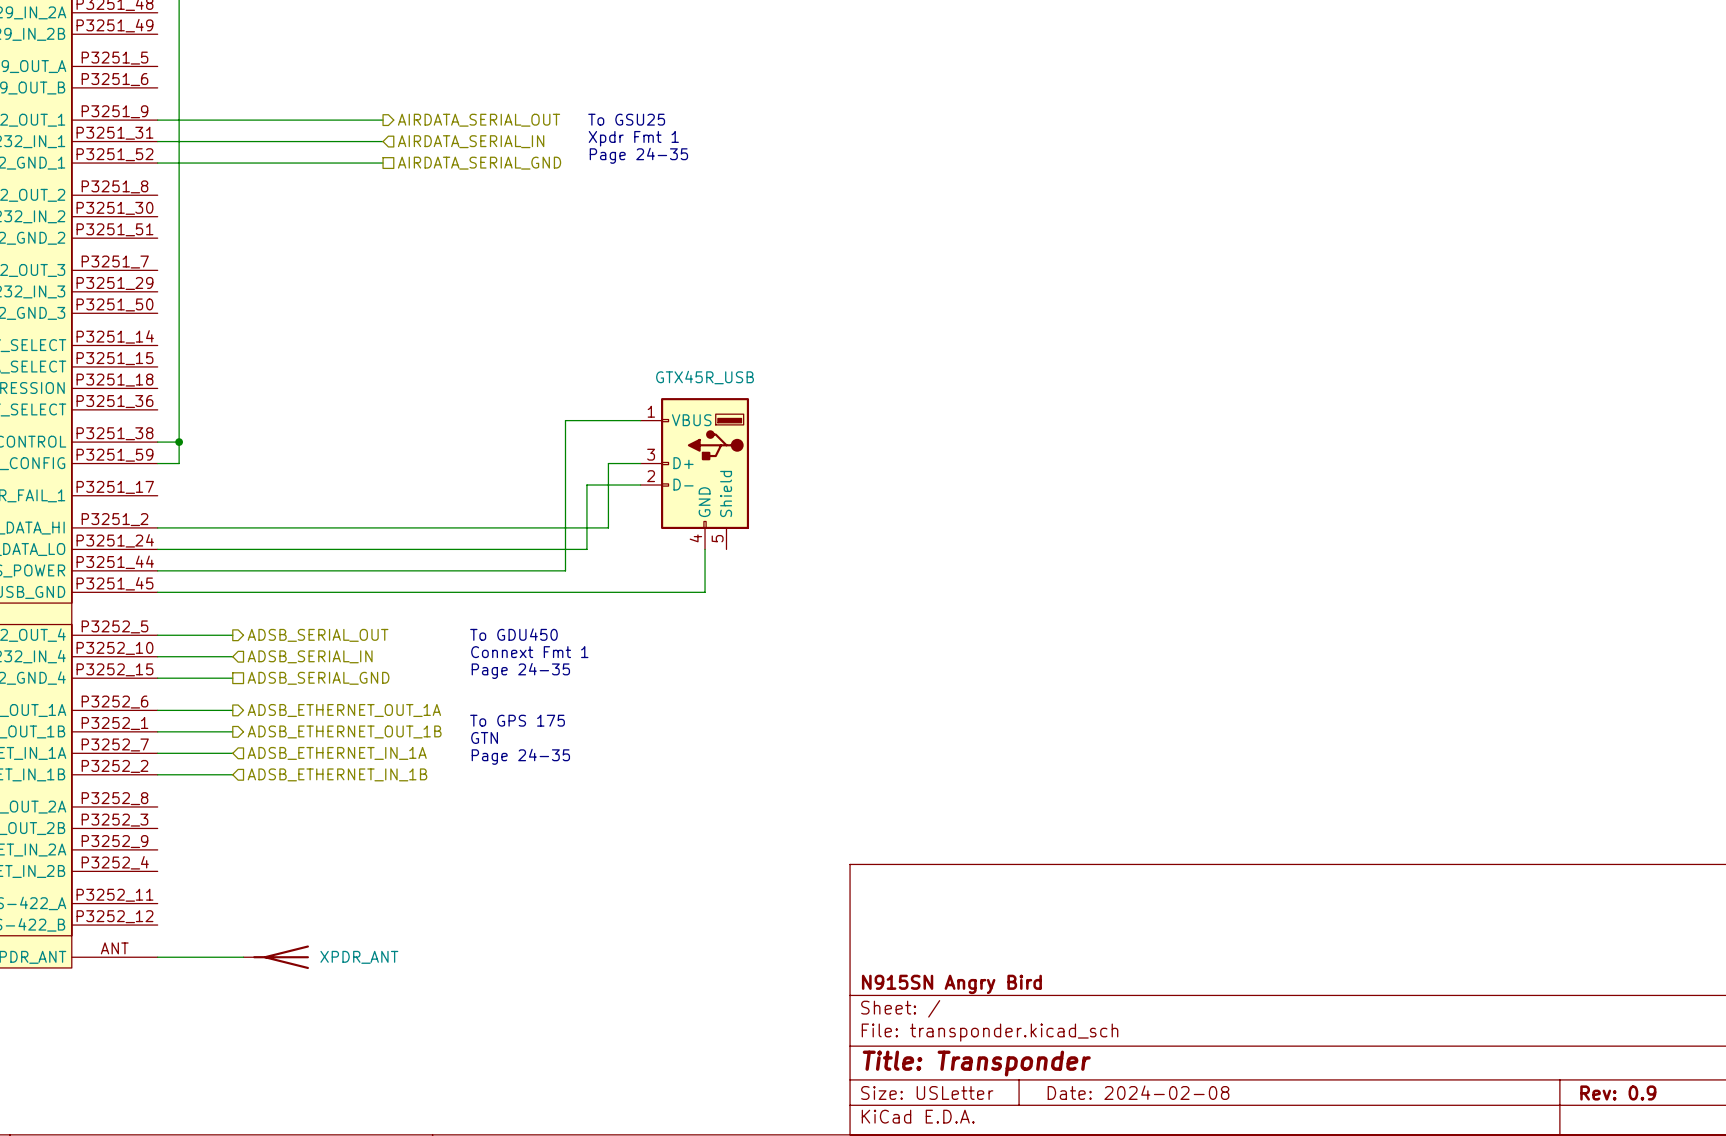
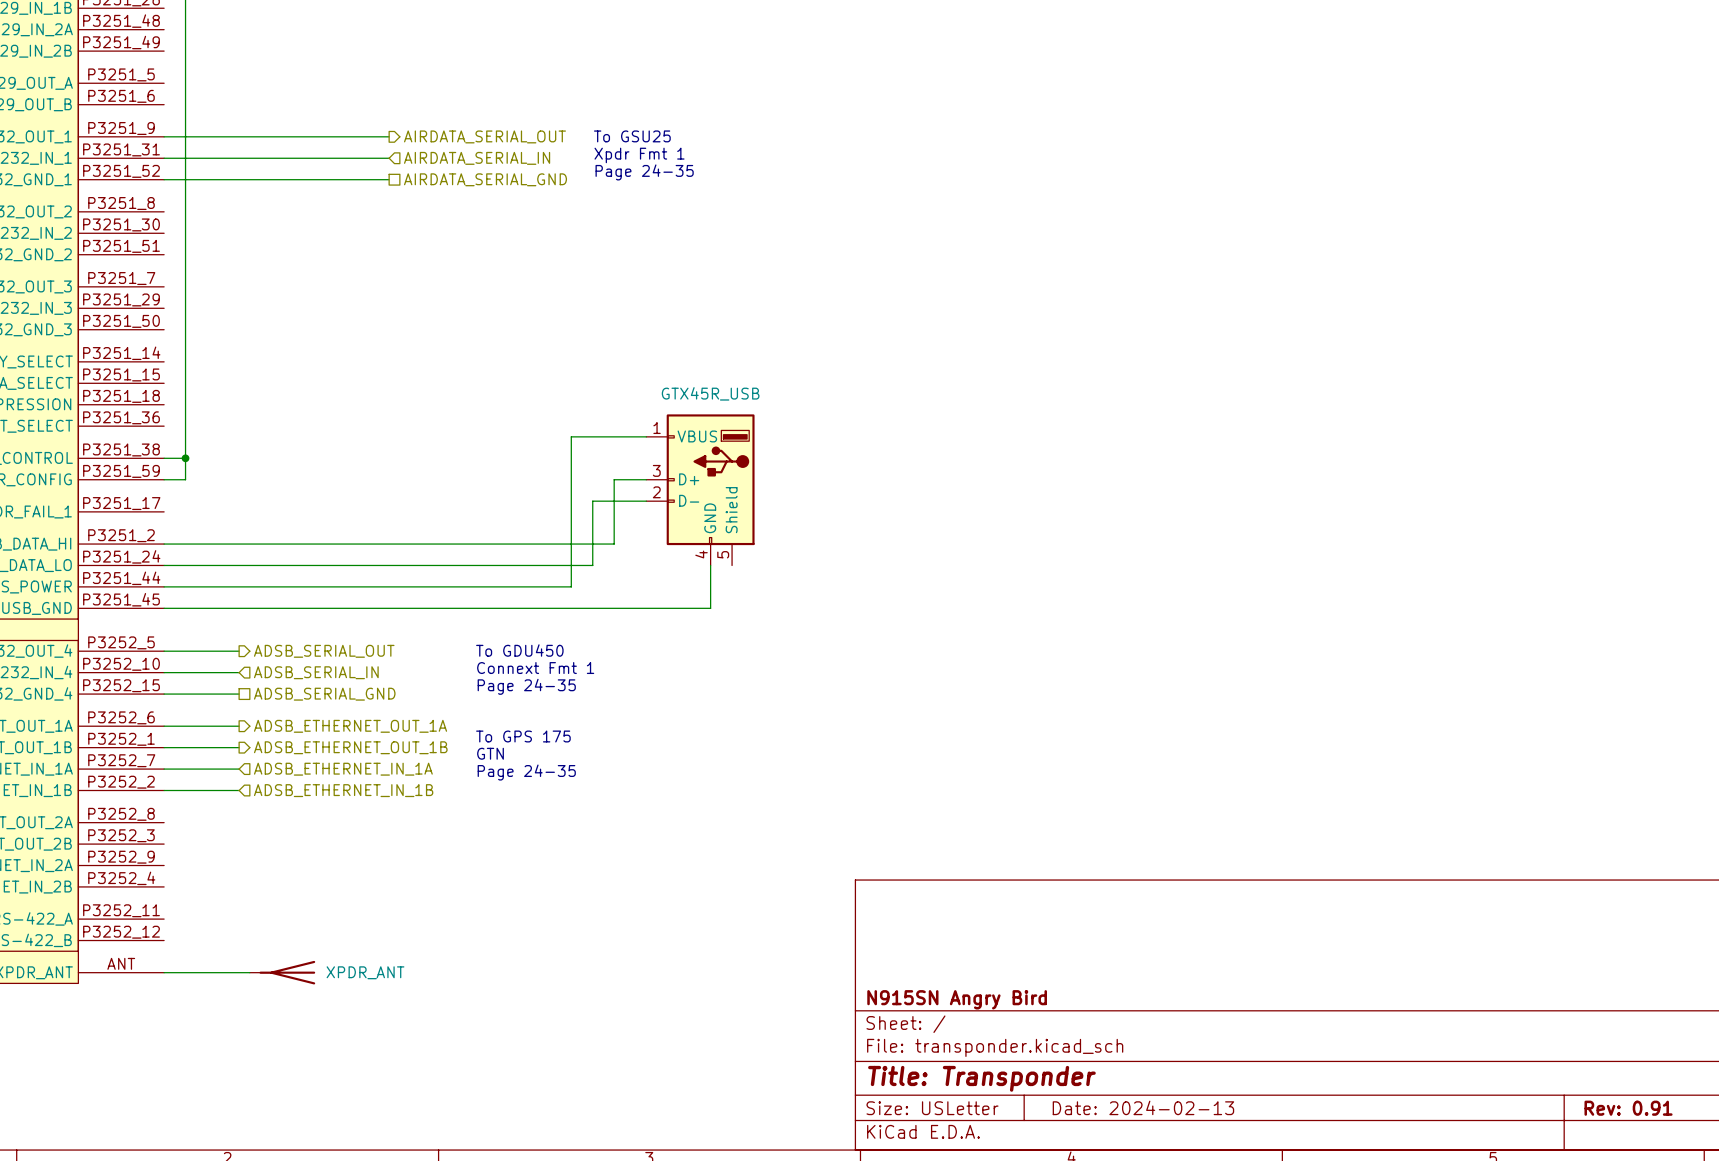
title block: Date: 2024-02-08 (1138, 1092) -> Date: 2024-02-13 (1143, 1107)
title block: Rev: 0.9 (1618, 1092) -> Rev: 0.91 (1628, 1108)

